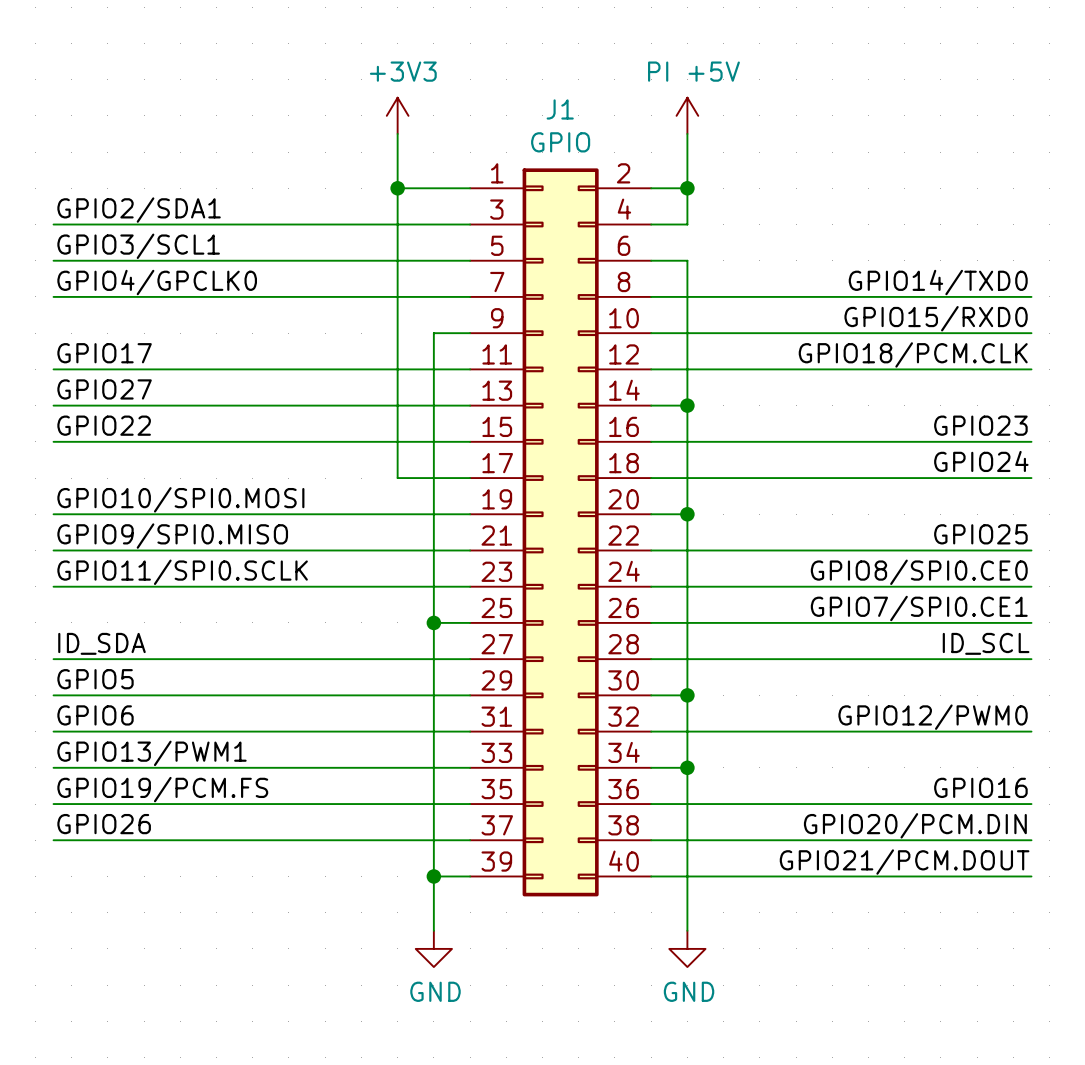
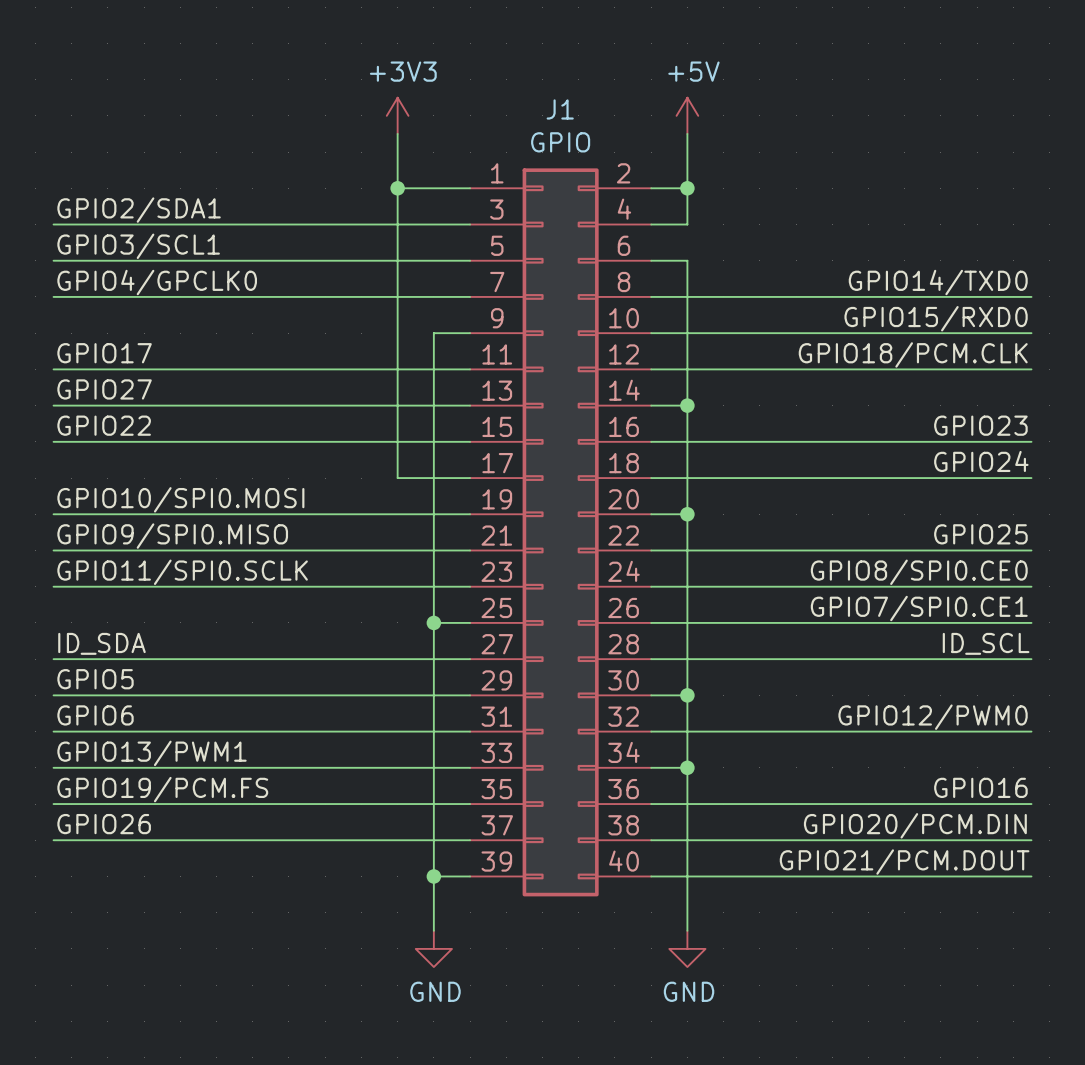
power symbol: PI +5V (687, 115) -> +5V (687, 115)

